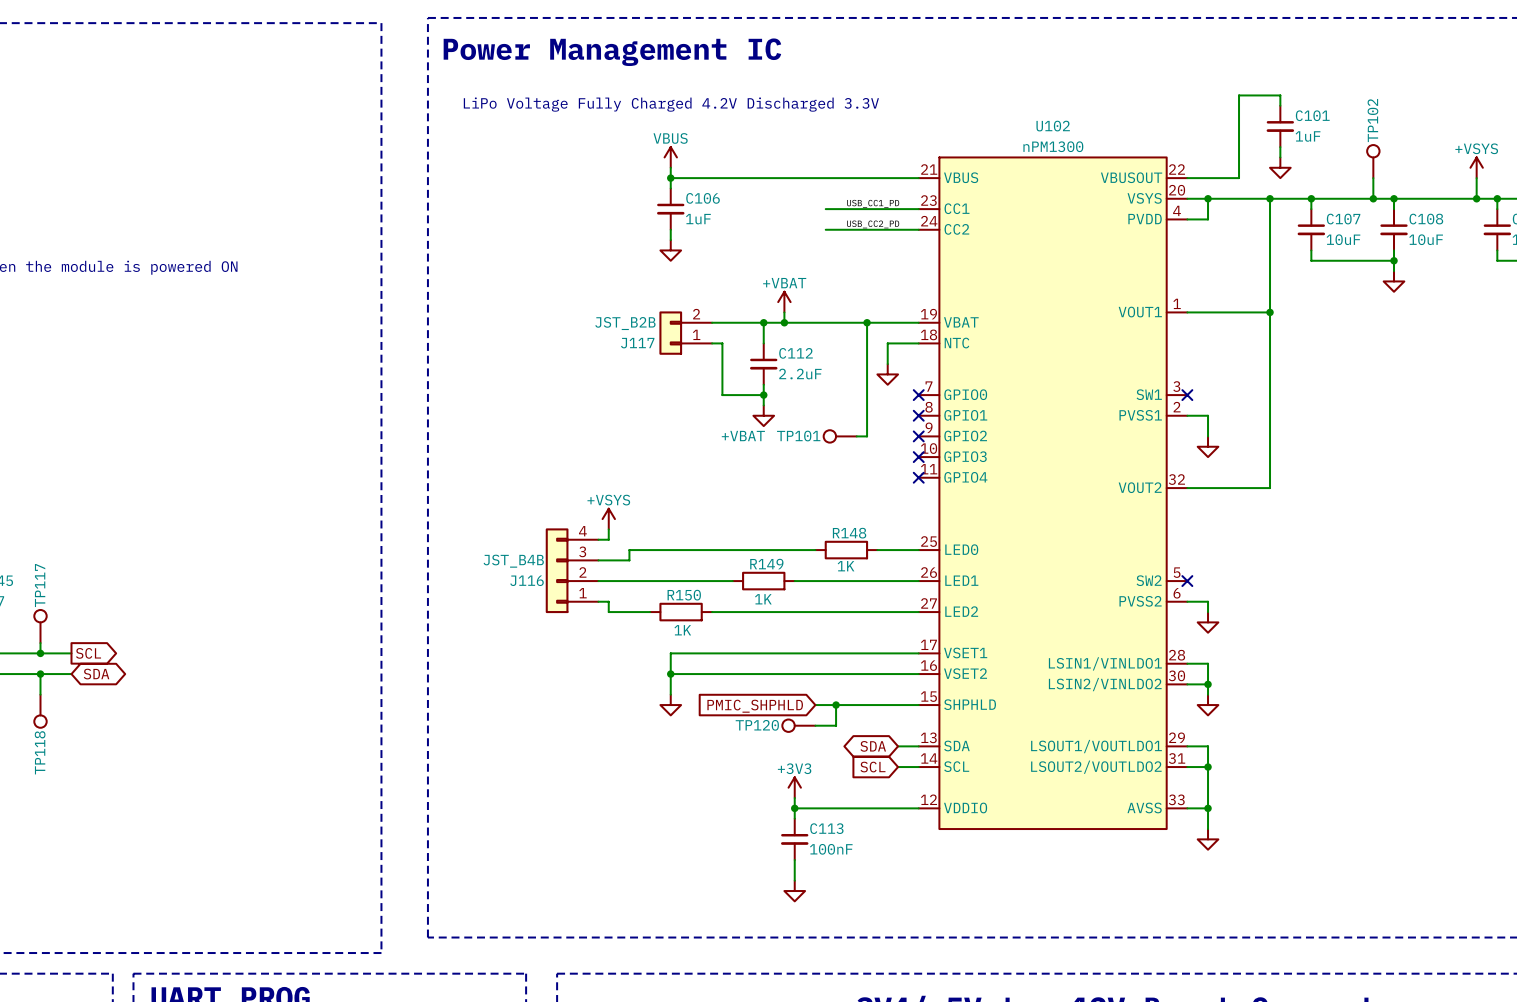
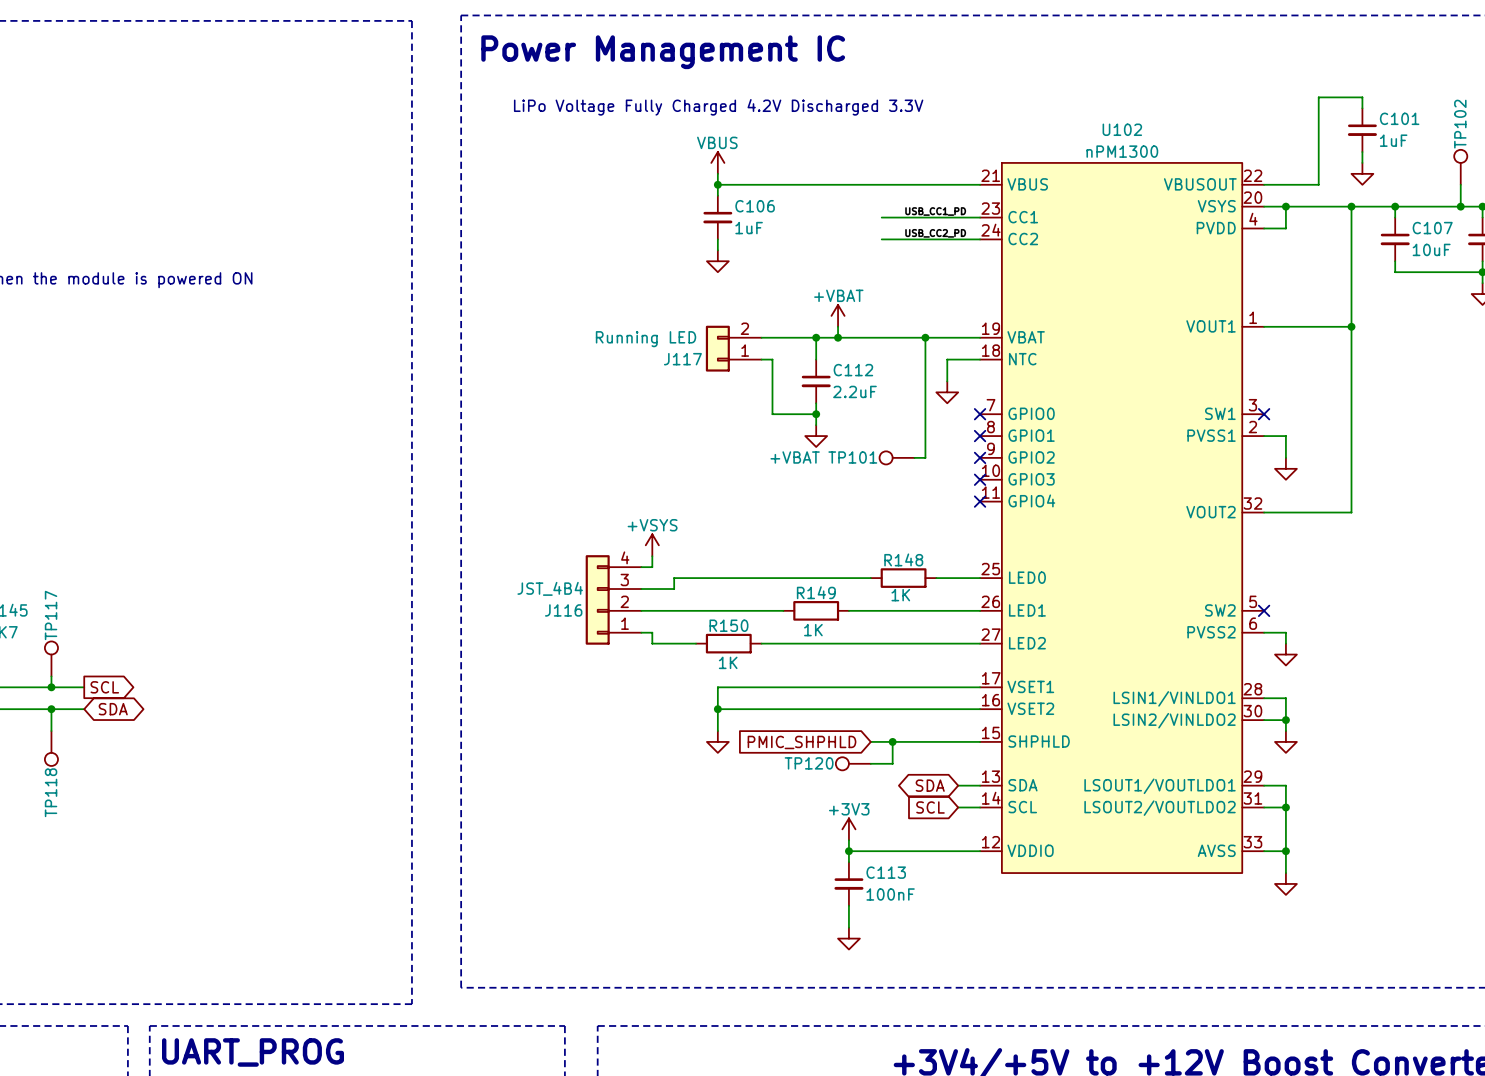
J117 value: JST_B2B (625, 323) -> Running LED (646, 339)
J116 value: JST_B4B (513, 561) -> JST_4B4 (550, 588)

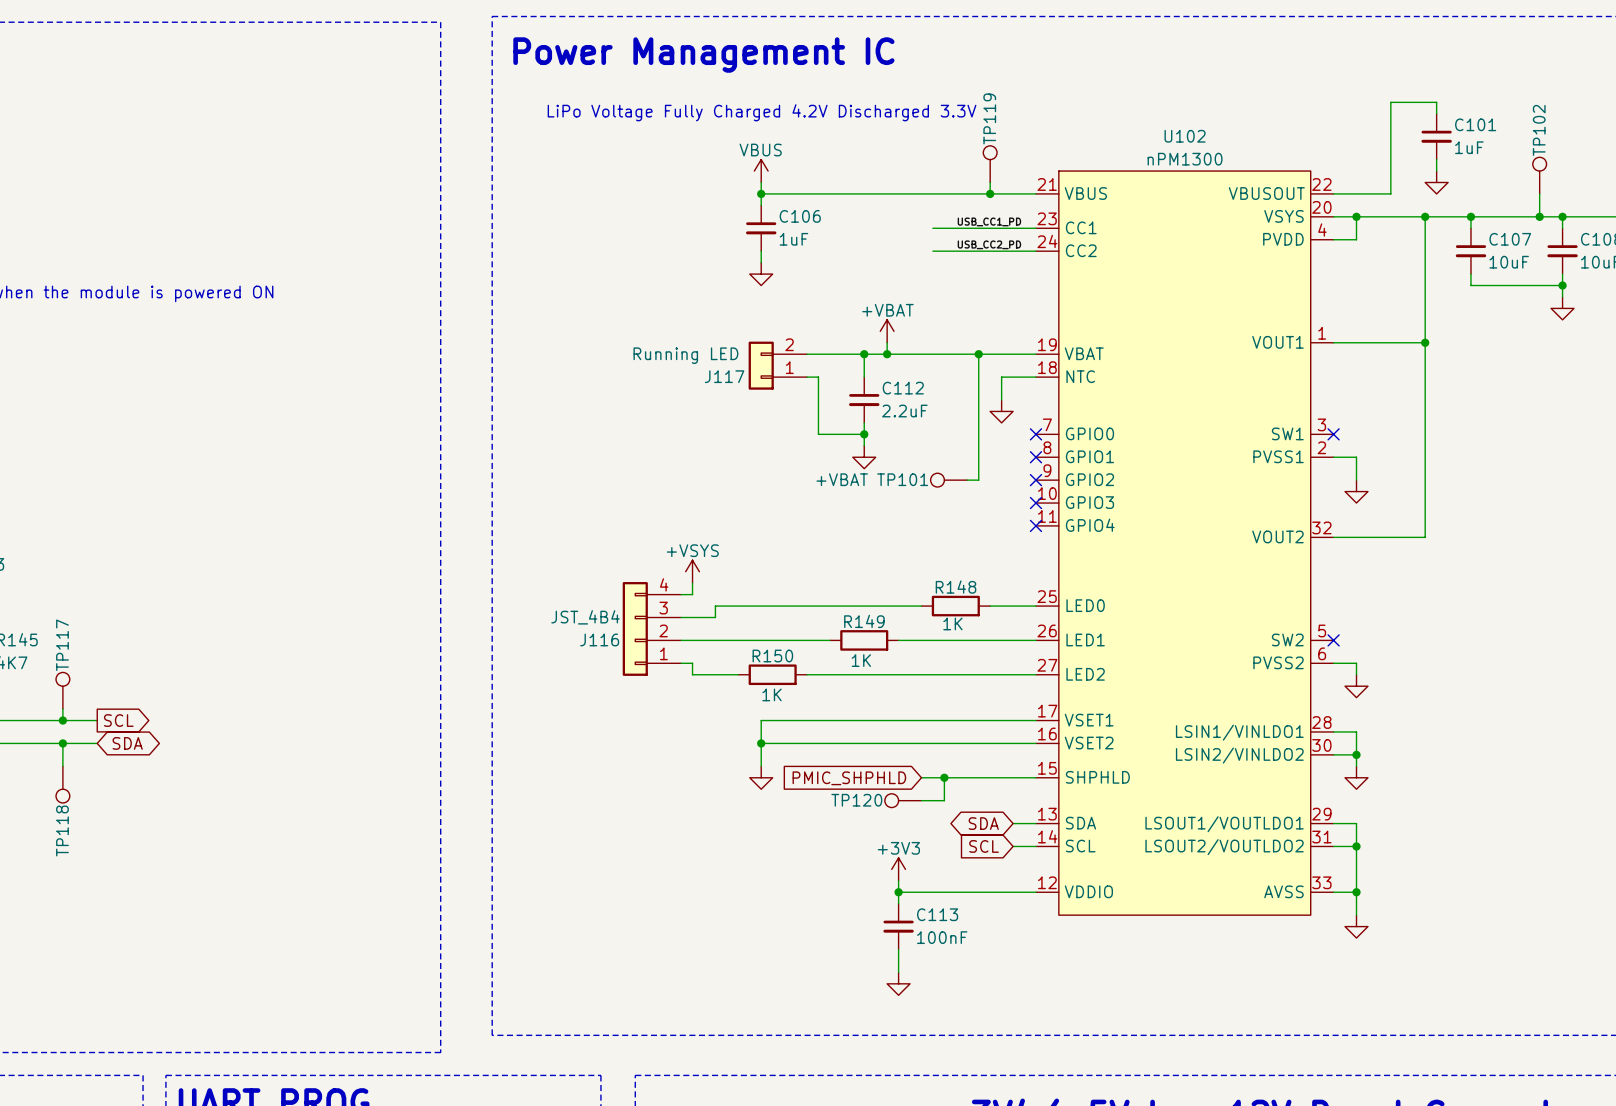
TP119: none -> (990, 164)
wire: none -> (990, 182) (990, 193)
junction: none -> (990, 193)

